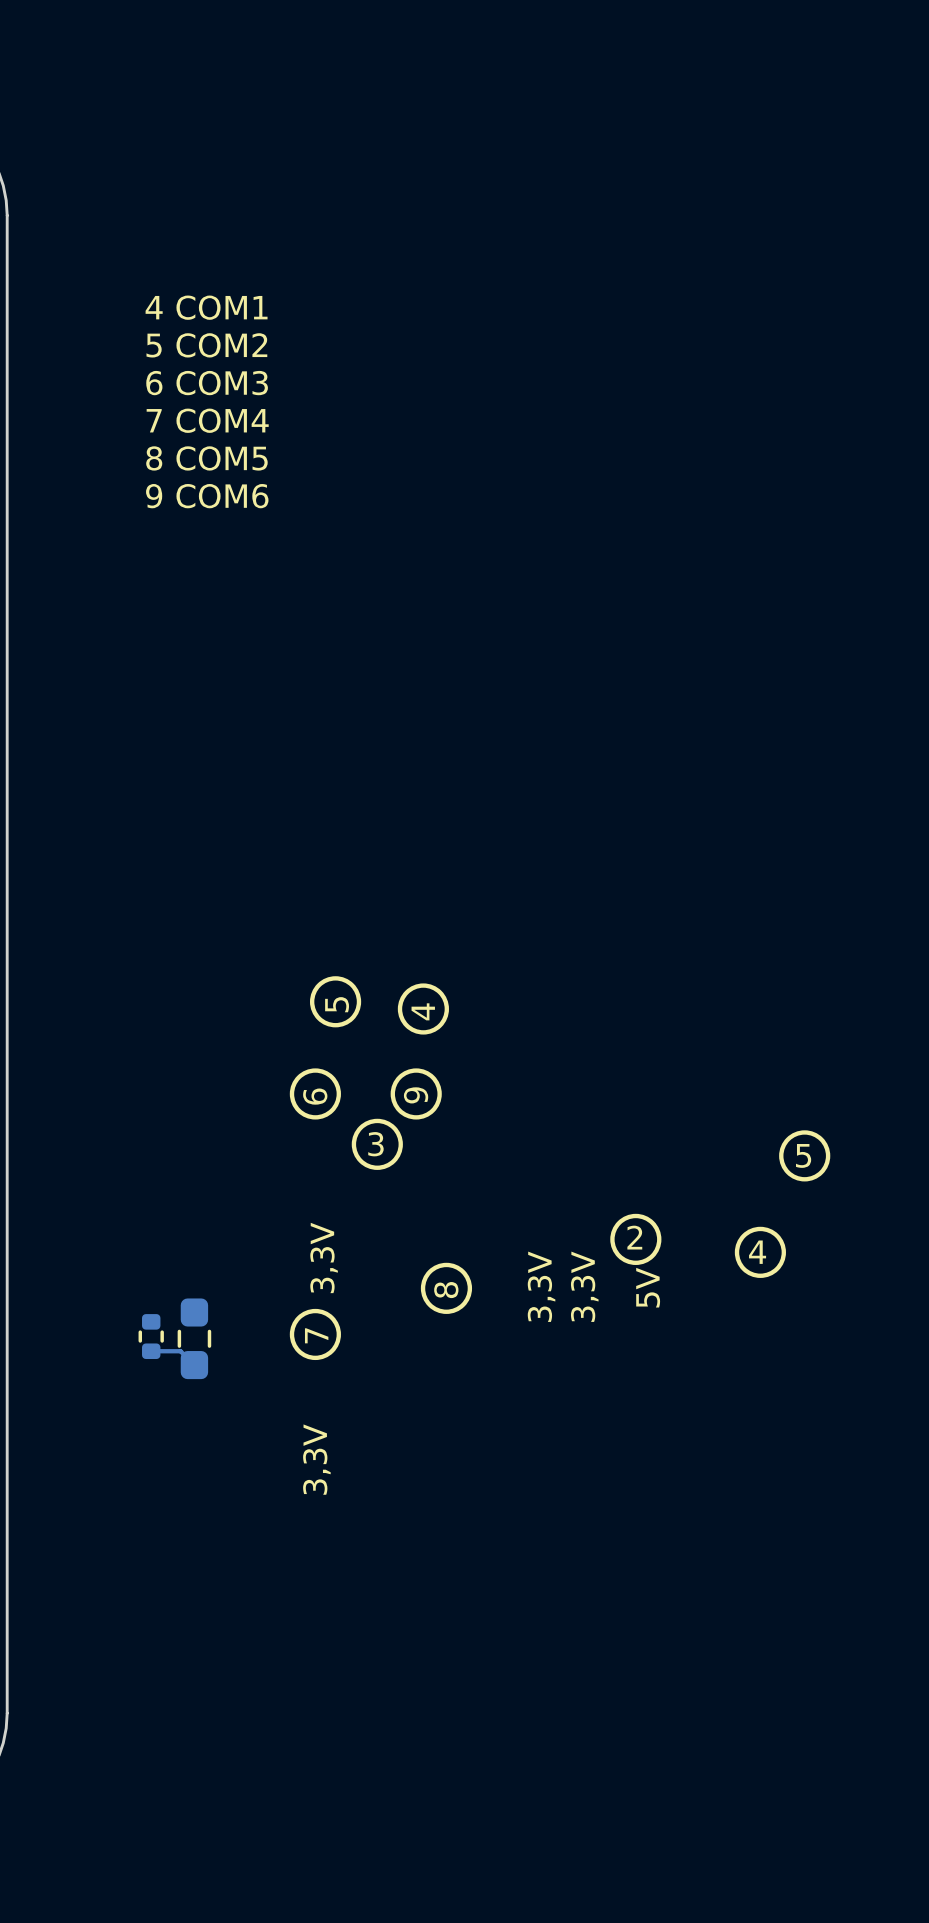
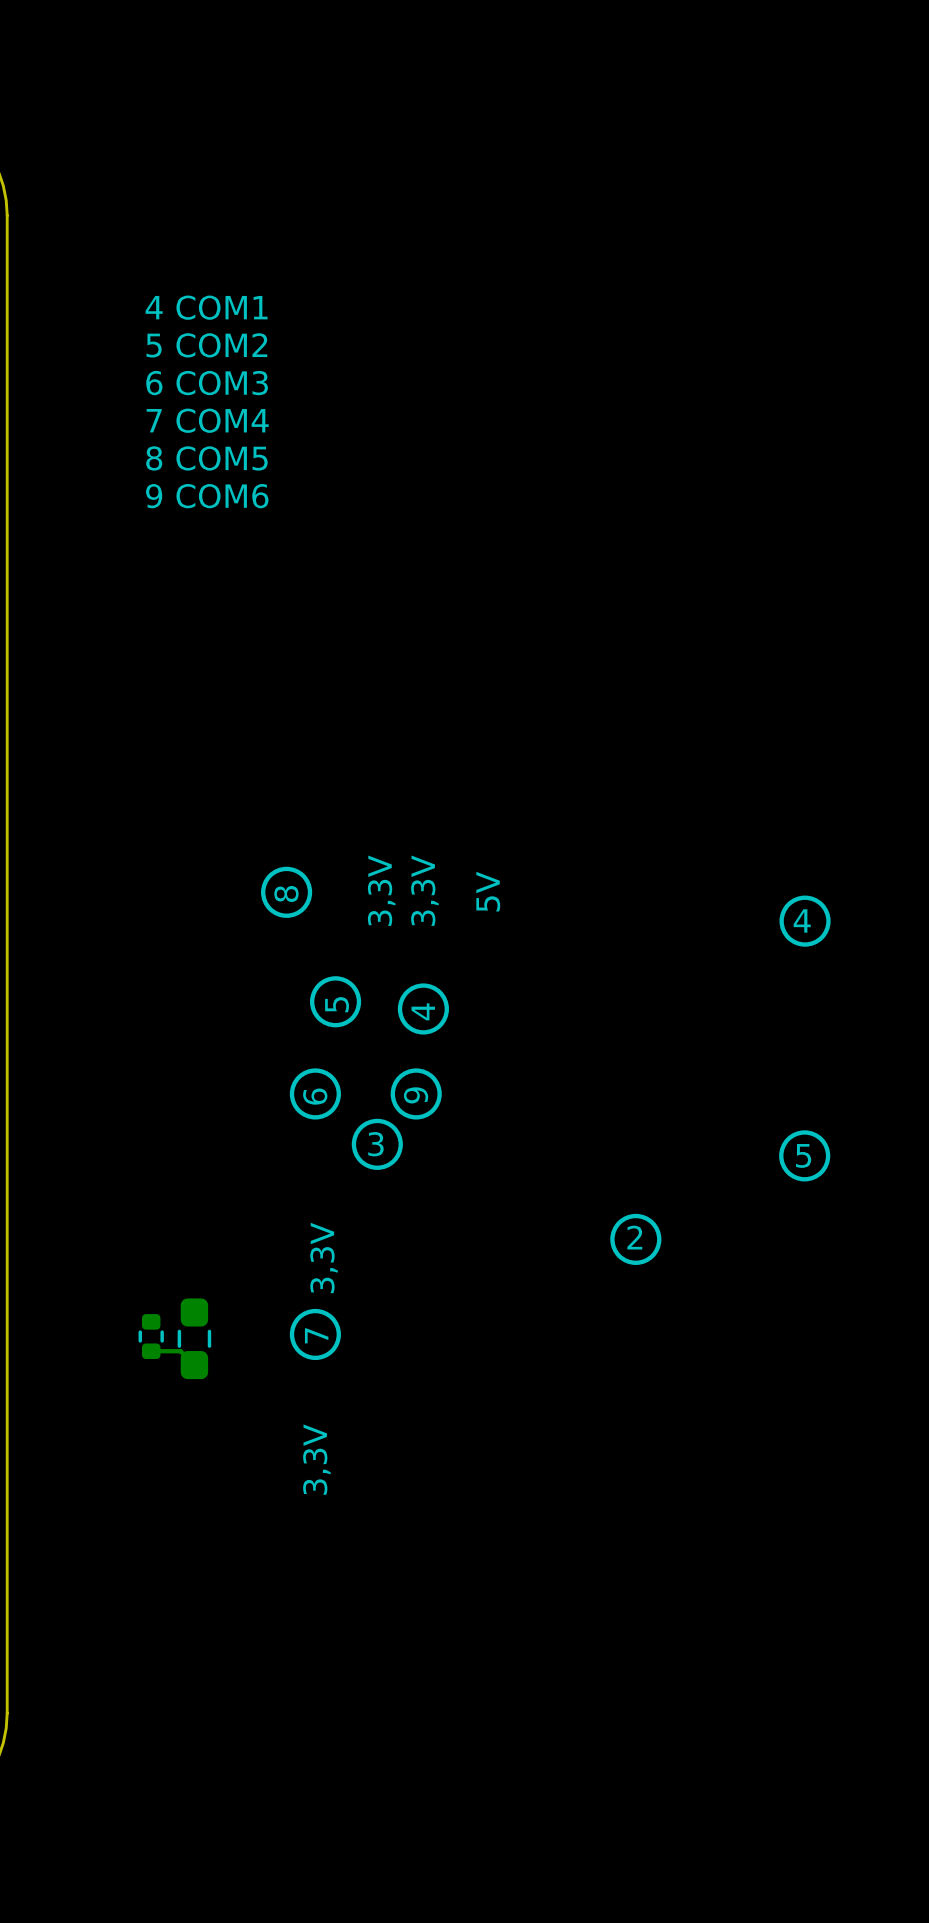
drawing: none -> [261, 866, 313, 918]
text: none -> 3,3V (381, 890)
text: none -> 3,3V (424, 890)
drawing: none -> [779, 895, 831, 947]
drawing: [734, 1226, 786, 1278] -> none
text position: 4 (757, 1252) -> 4 (802, 920)
drawing: [420, 1262, 473, 1314] -> none
text: 3,3V (541, 1286) -> none
text: 3,3V (584, 1286) -> none
text position: 5V (648, 1287) -> 5V (488, 891)
text position: 8 (446, 1290) -> 8 (286, 894)

